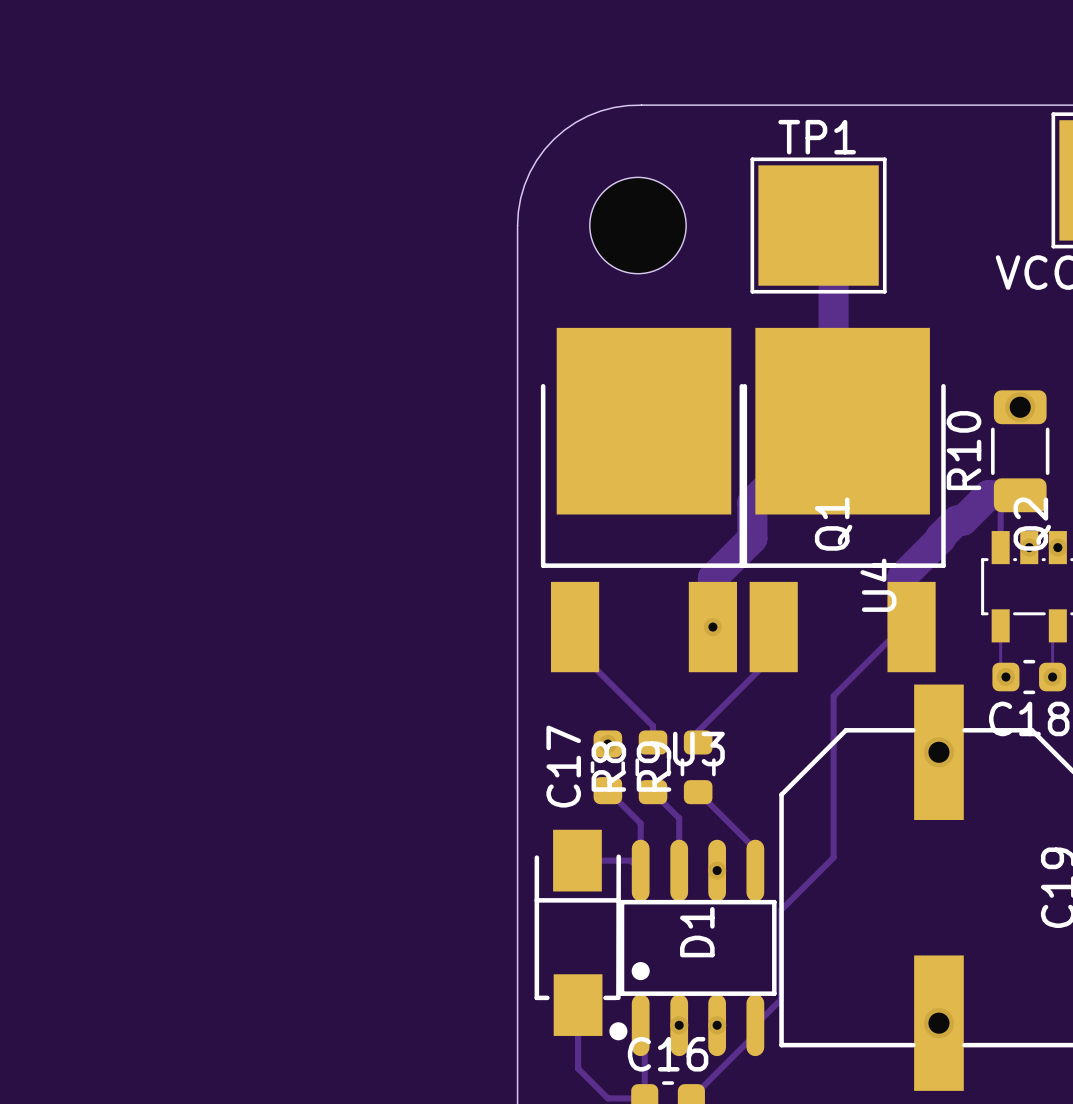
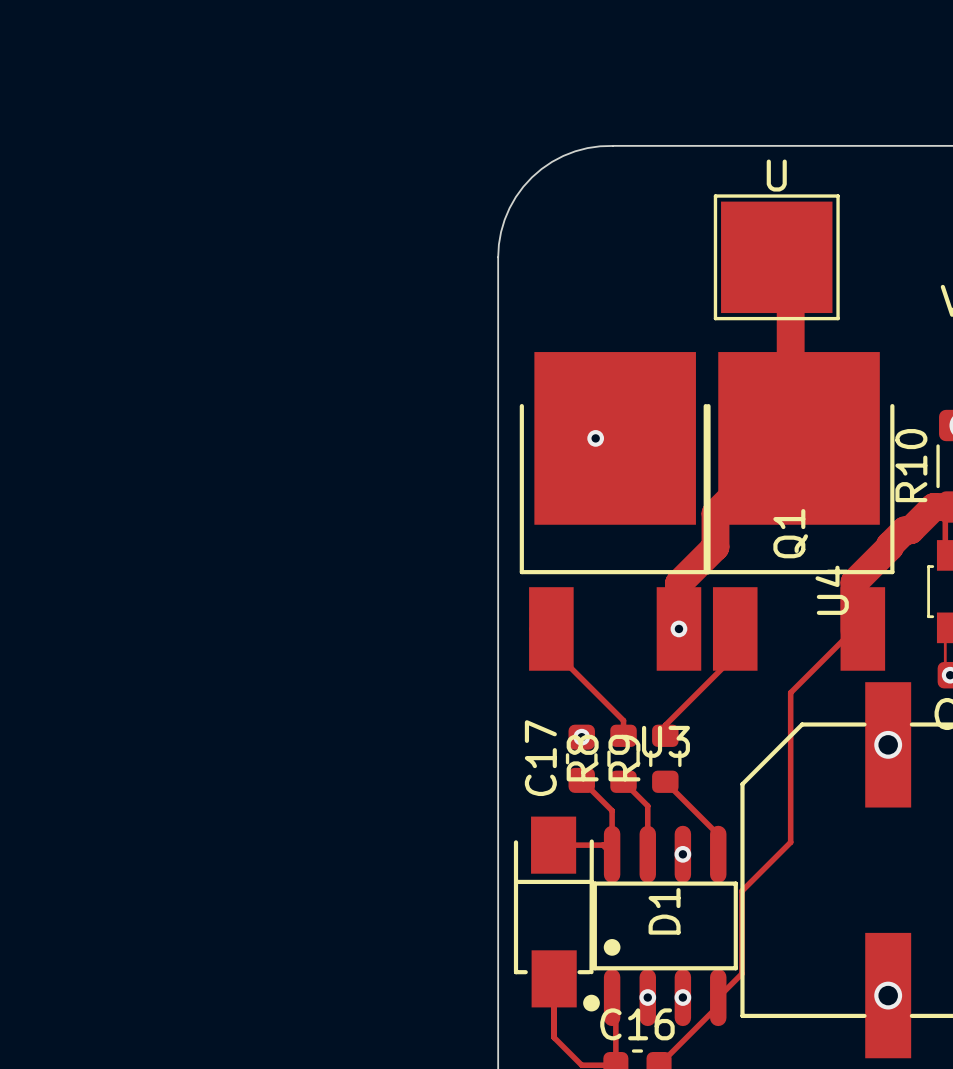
TP1 name: TP1 (817, 137) -> U (776, 175)
part: (637, 225) -> none
via: none -> (595, 438)

